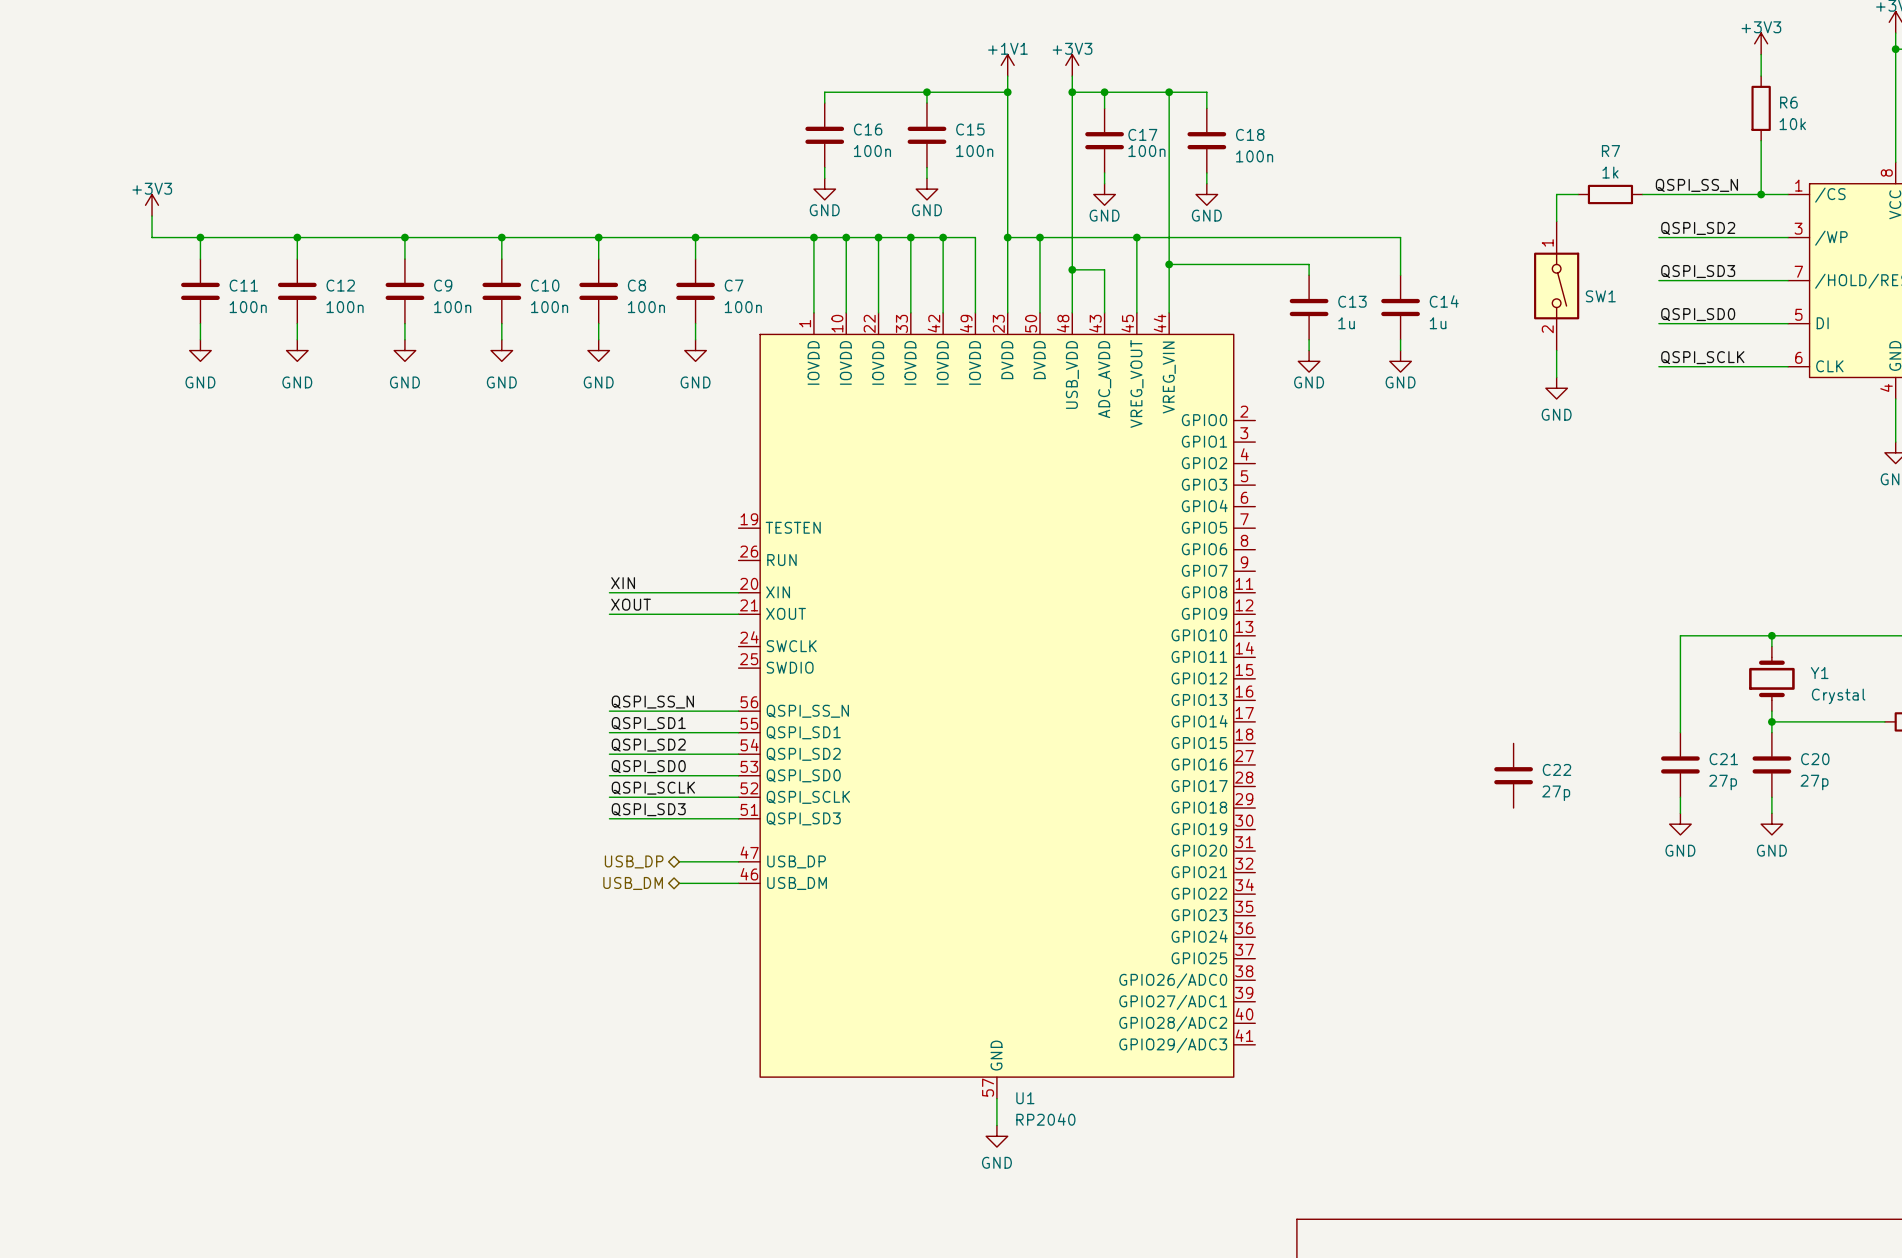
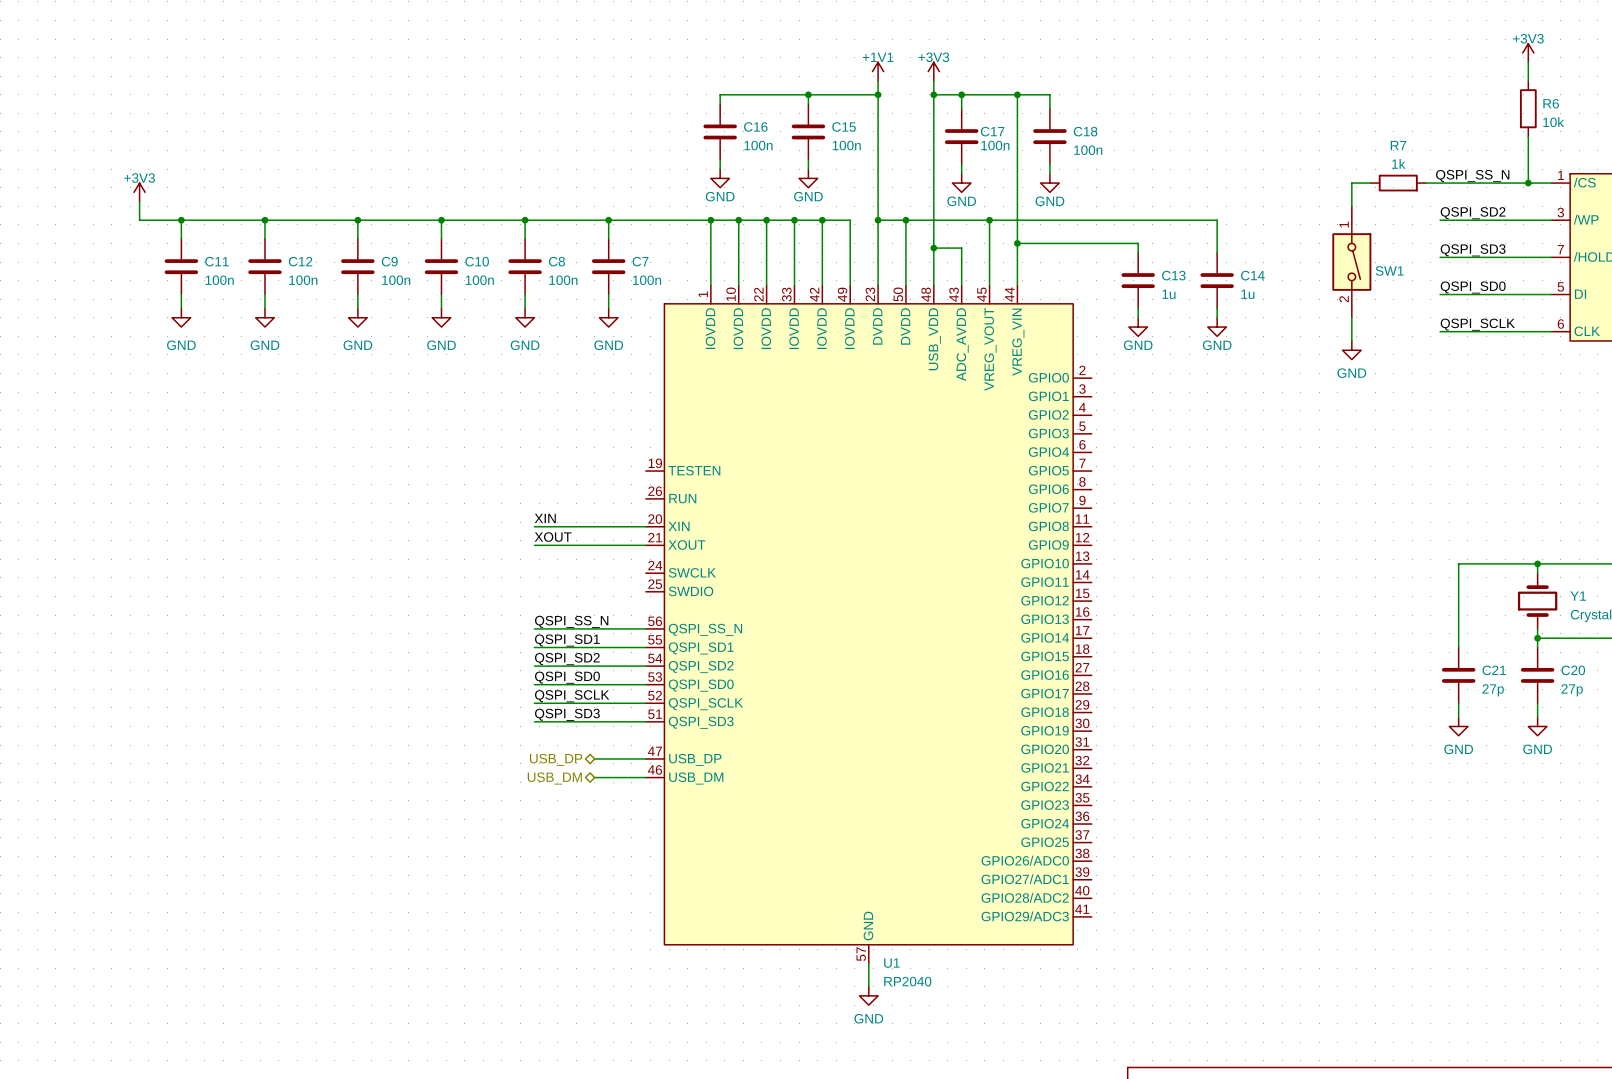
C22: 27p (1513, 775) -> none

